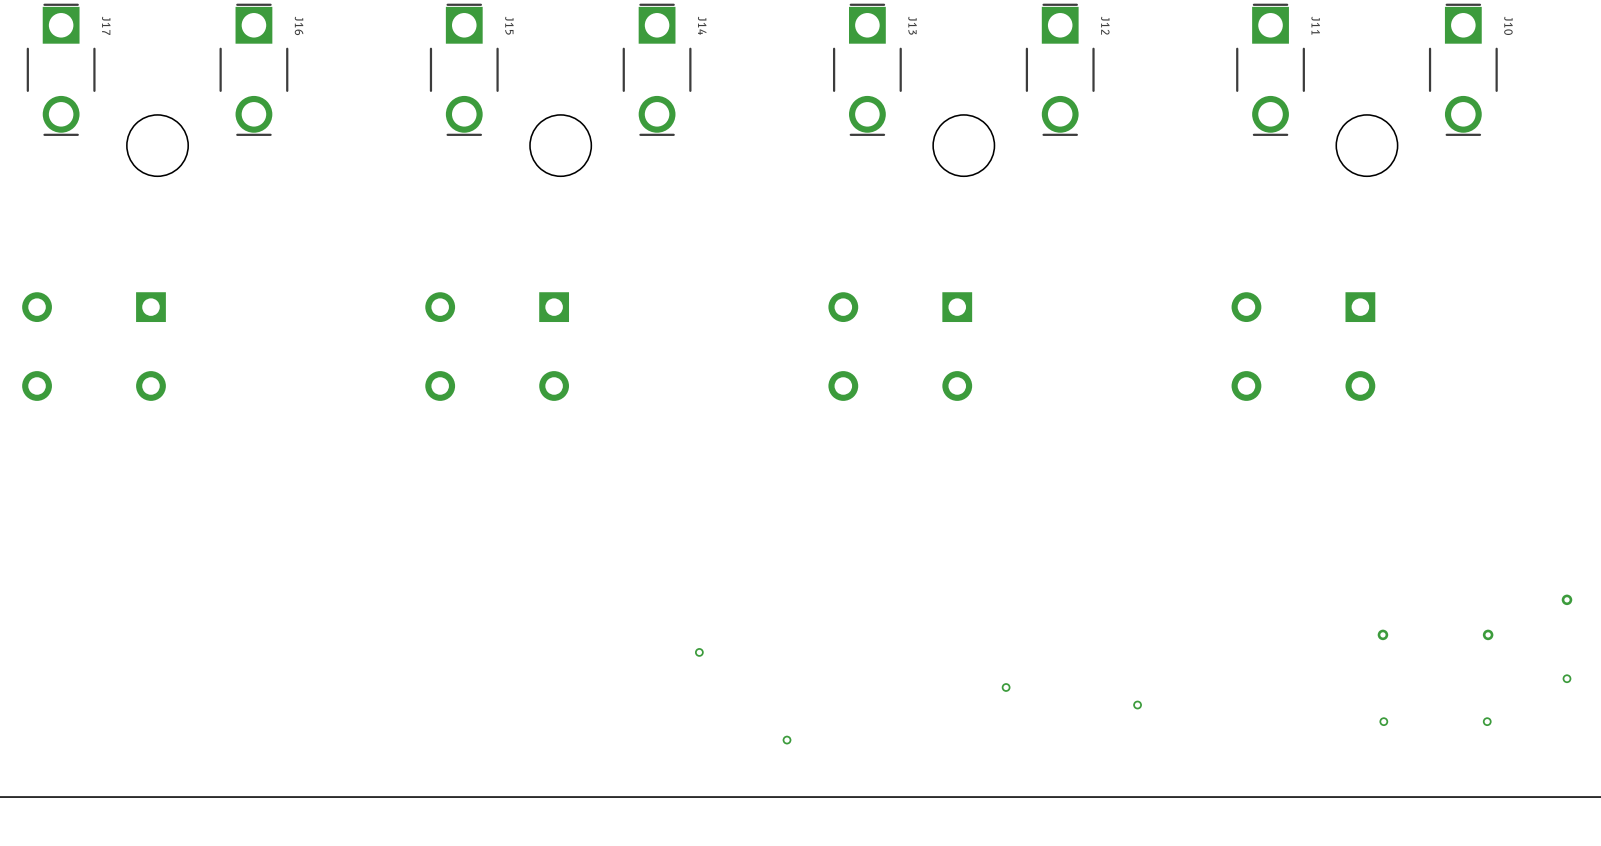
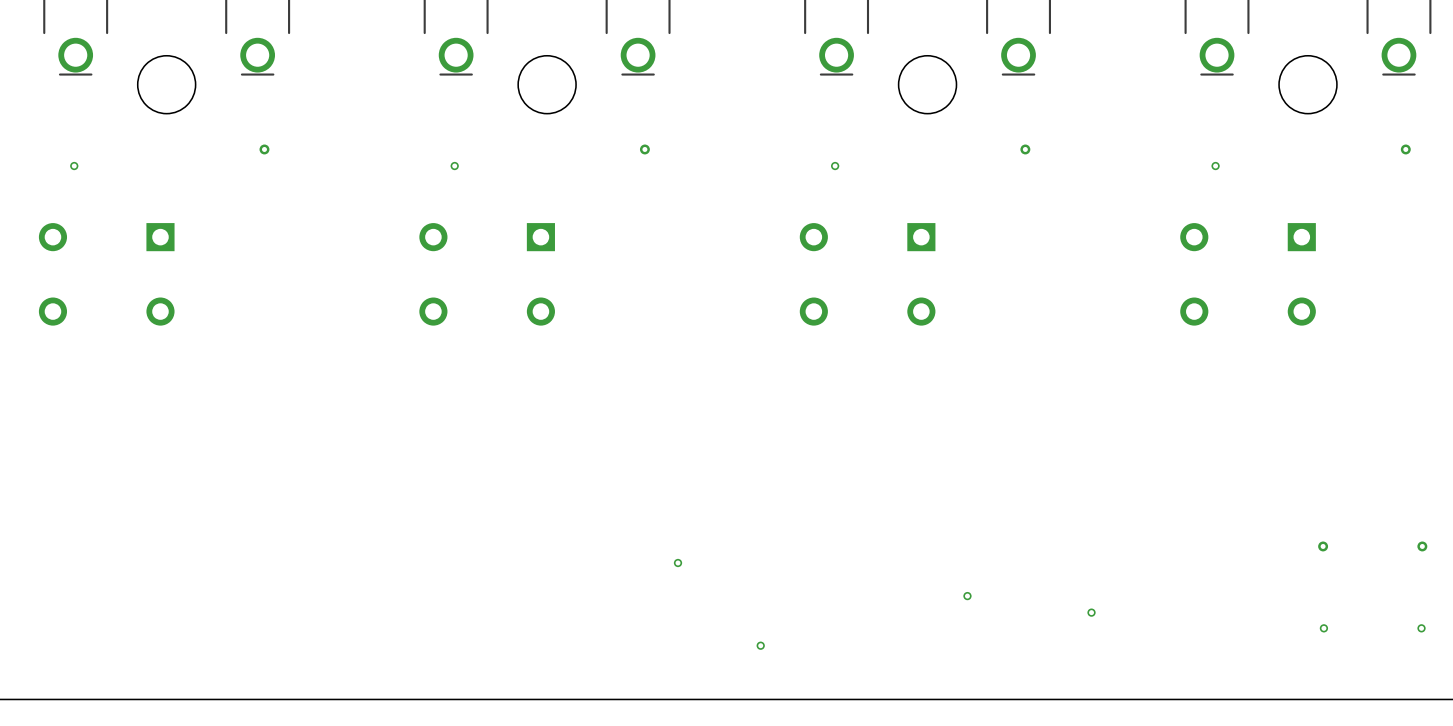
via: none -> (264, 149)
via: none -> (644, 149)
via: none -> (1025, 149)
via: none -> (1405, 149)
via: none -> (74, 166)
via: none -> (454, 166)
via: none -> (835, 166)
via: none -> (1215, 166)

